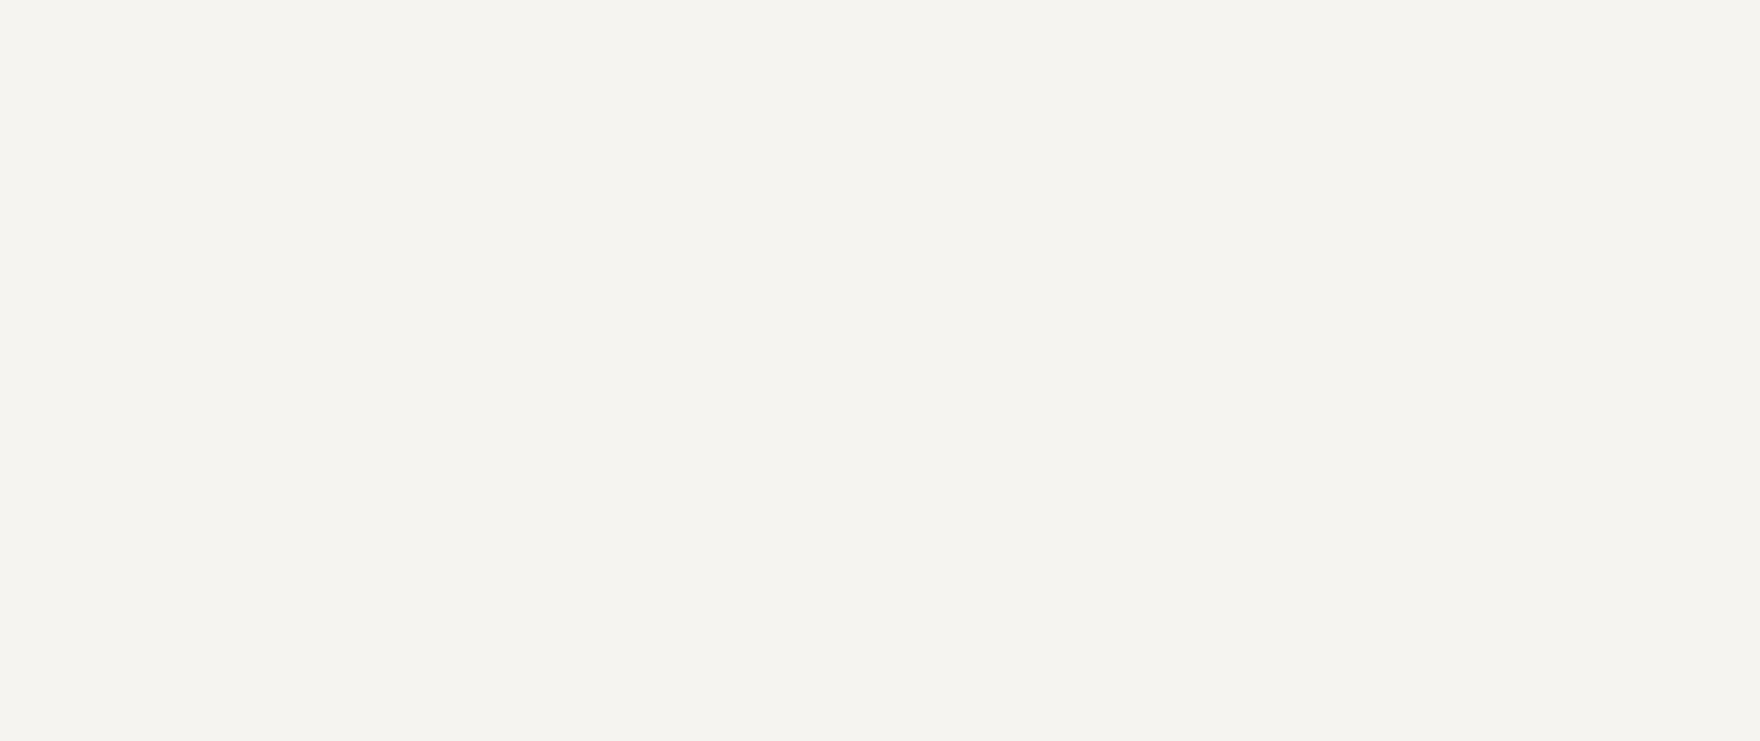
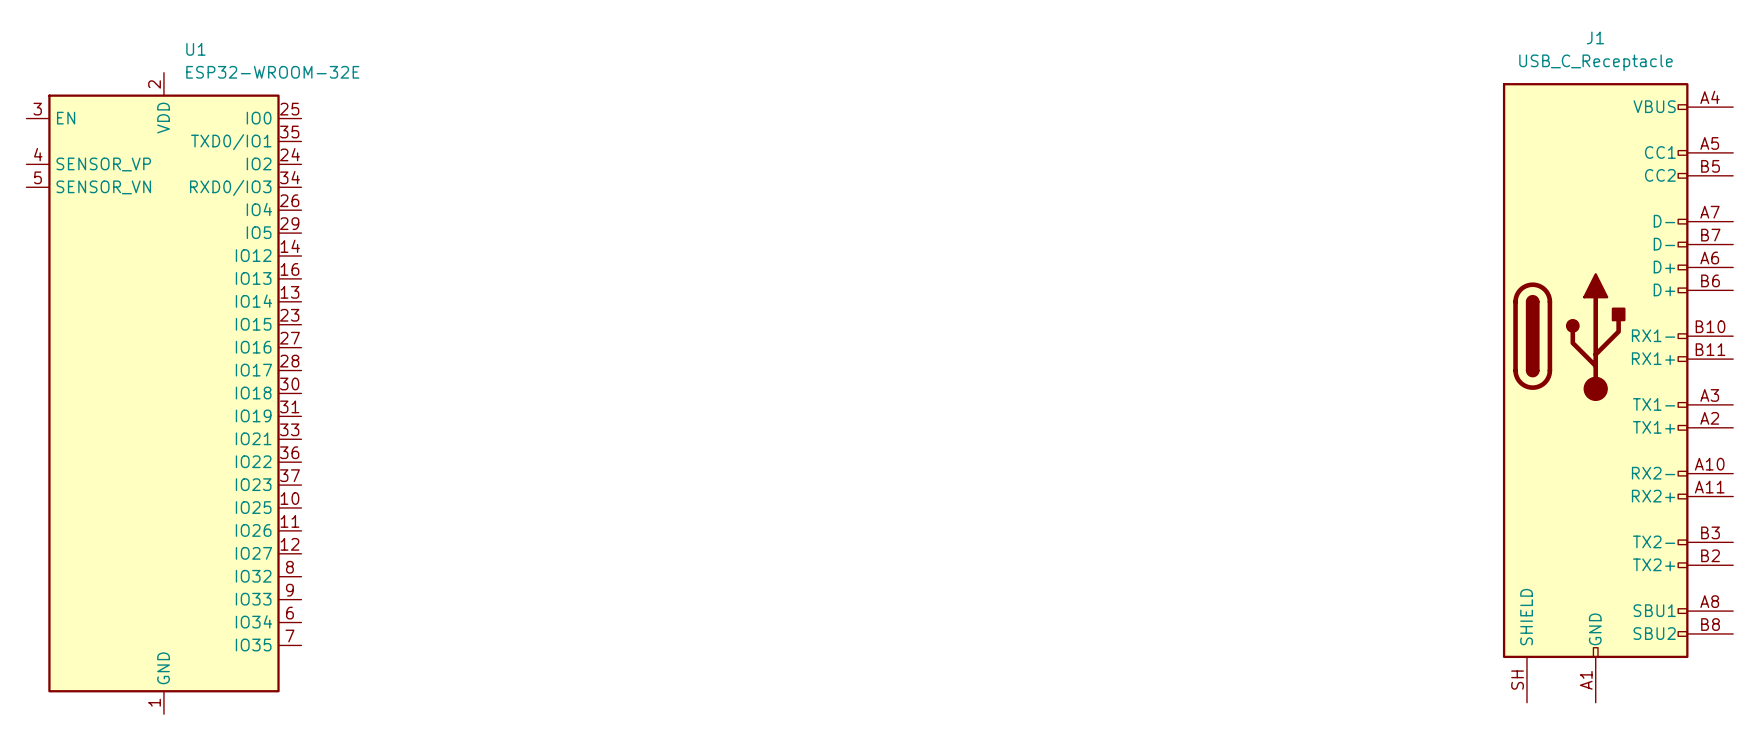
J1: none -> USB_C_Receptacle (1618, 392)
U1: none -> ESP32-WROOM-32E (163, 393)

